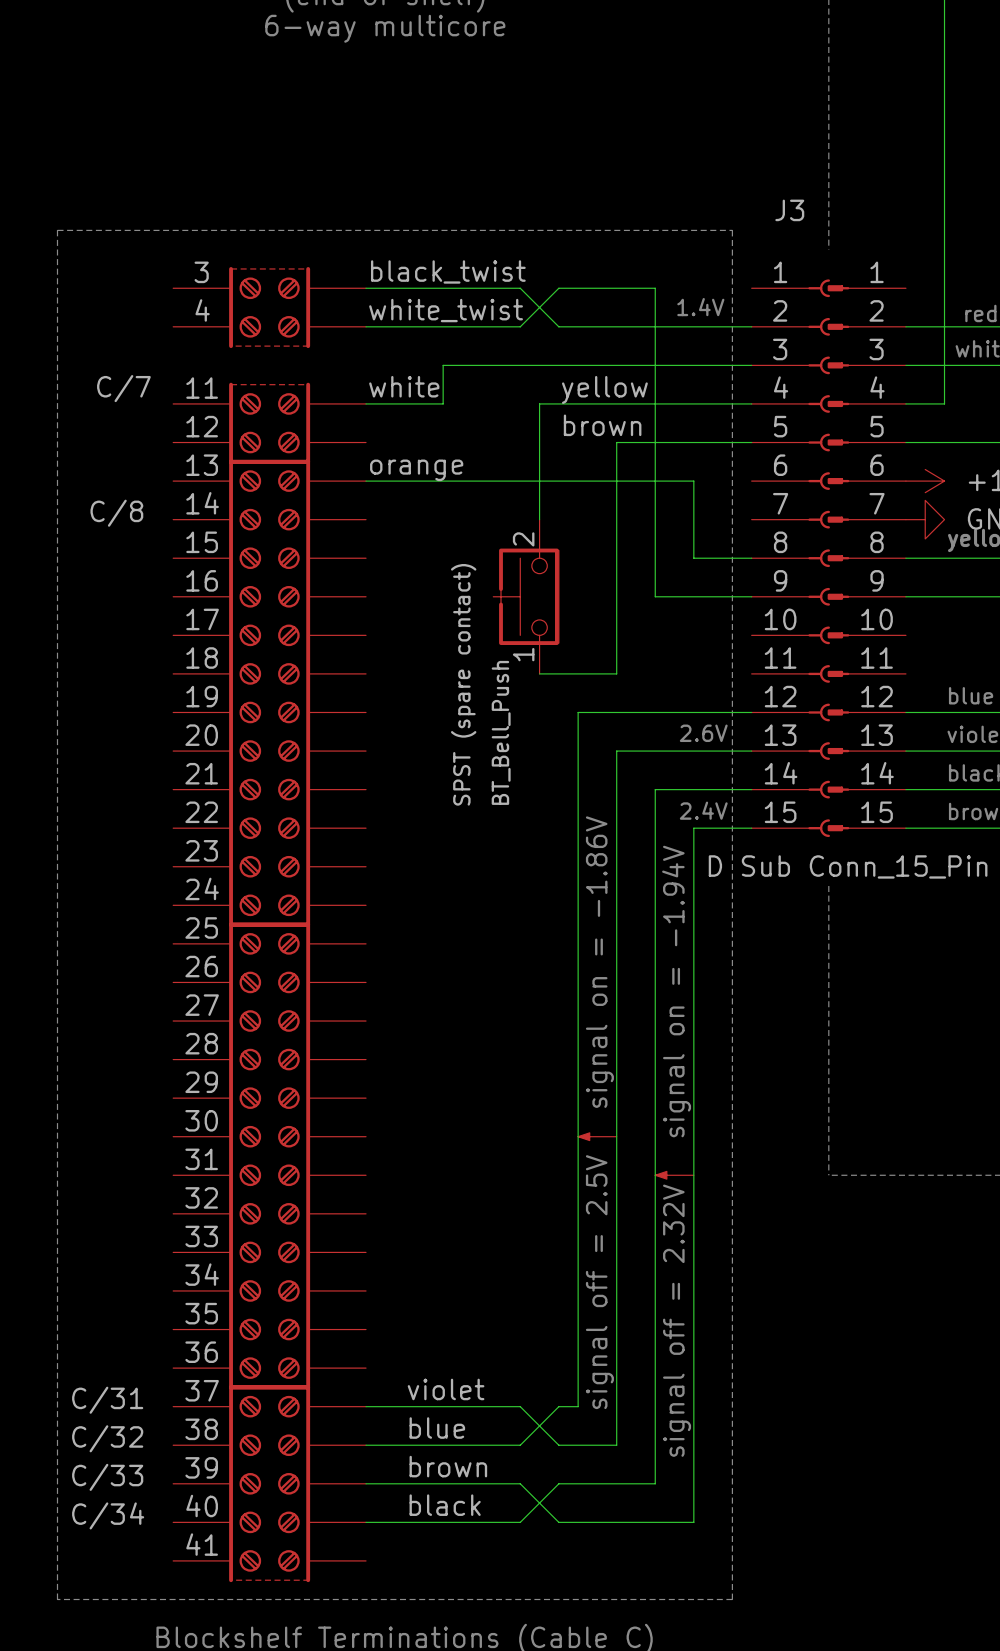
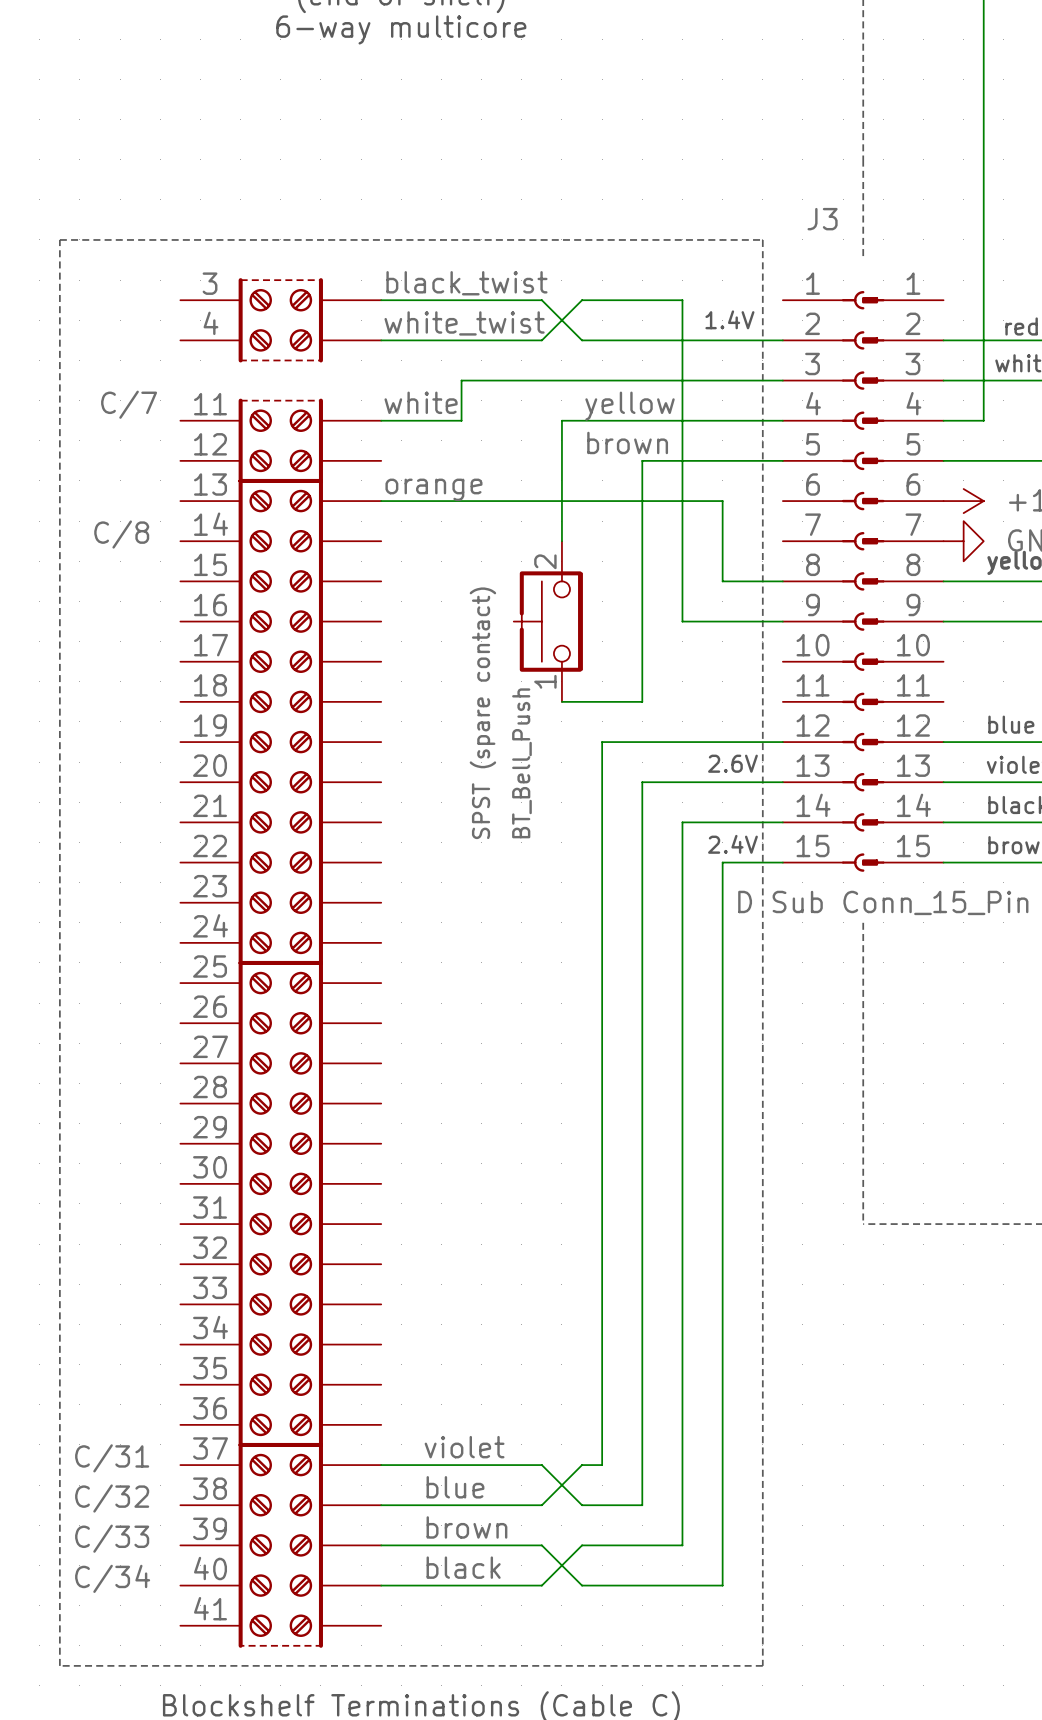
text: signal off = 2.5V signal on = -1.86V (599, 1112) -> none
power symbol: (597, 1136) -> none
text: signal off = 2.32V signal on = -1.94V (676, 1151) -> none
power symbol: (674, 1175) -> none

